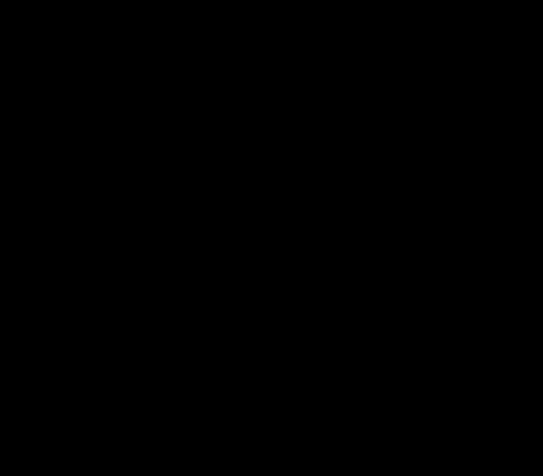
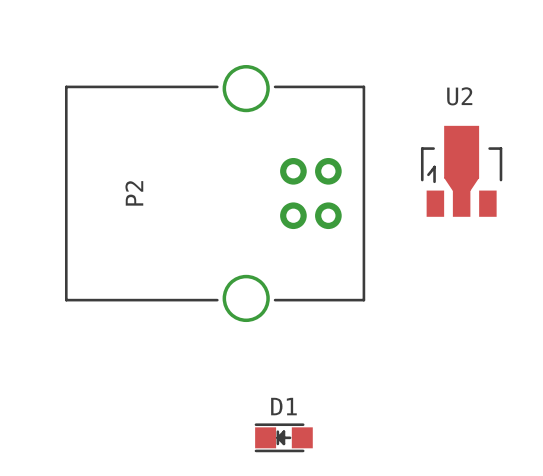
U2: none -> (461, 171)
P2: none -> (215, 193)
D1: none -> (283, 437)

